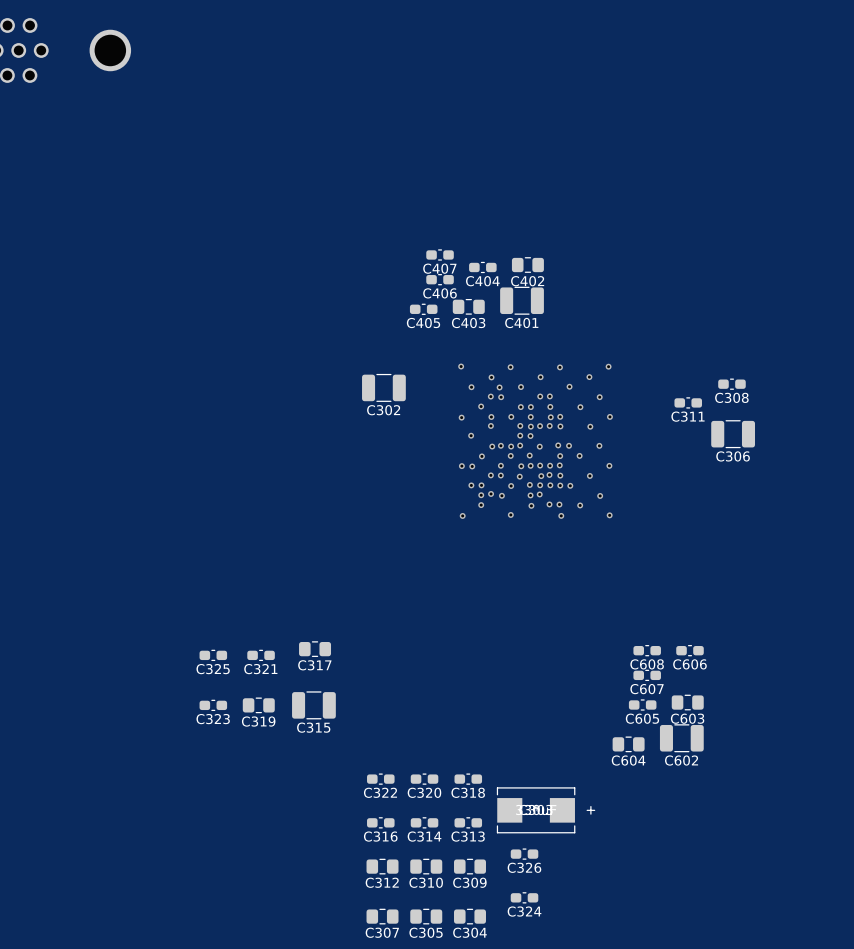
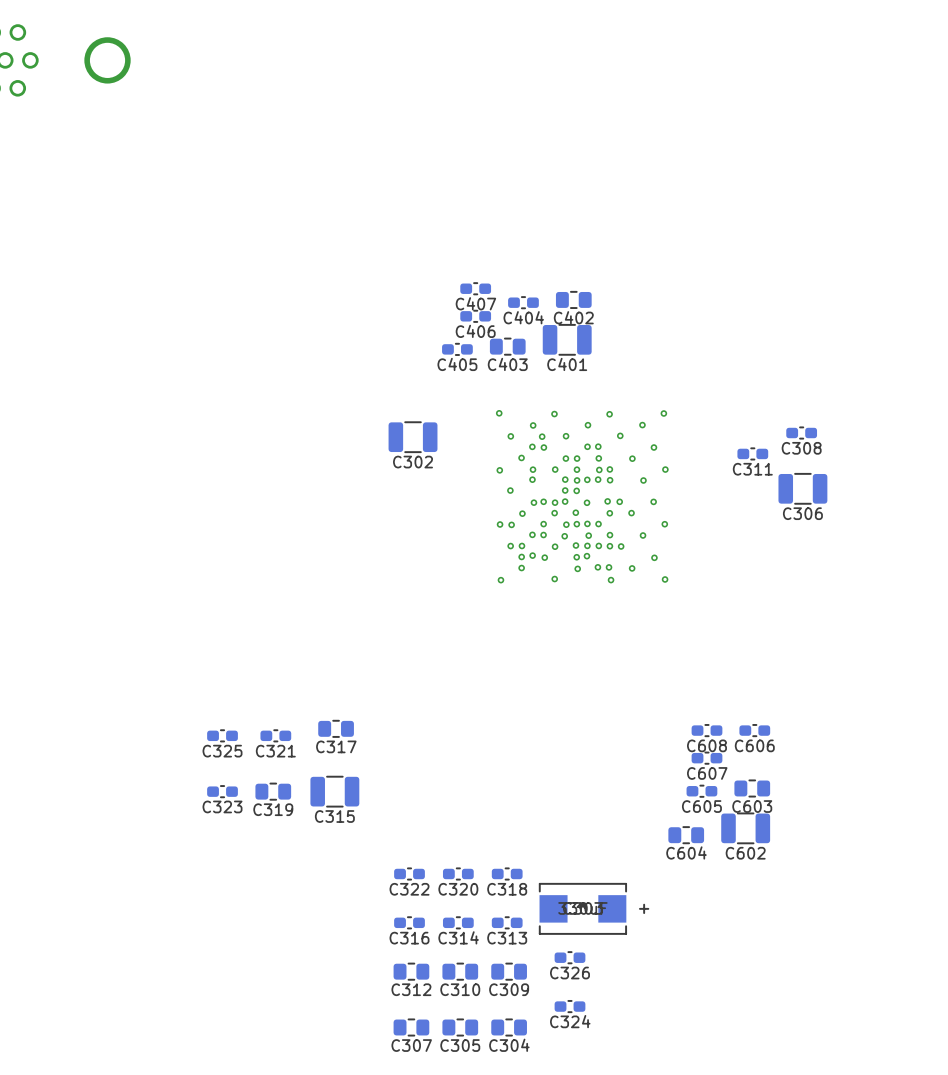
via: (559, 465) -> none
via: (549, 474) -> none

